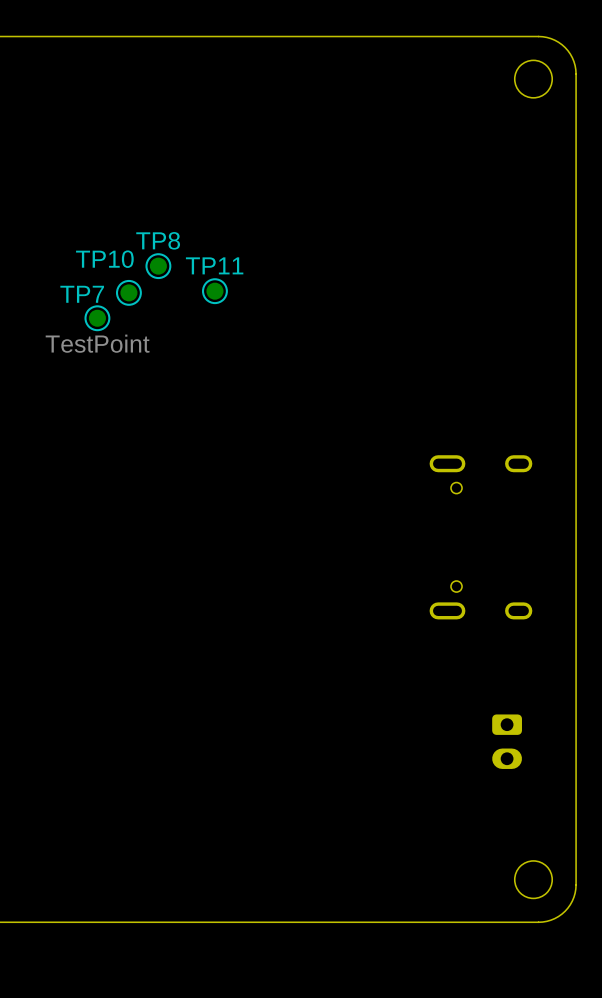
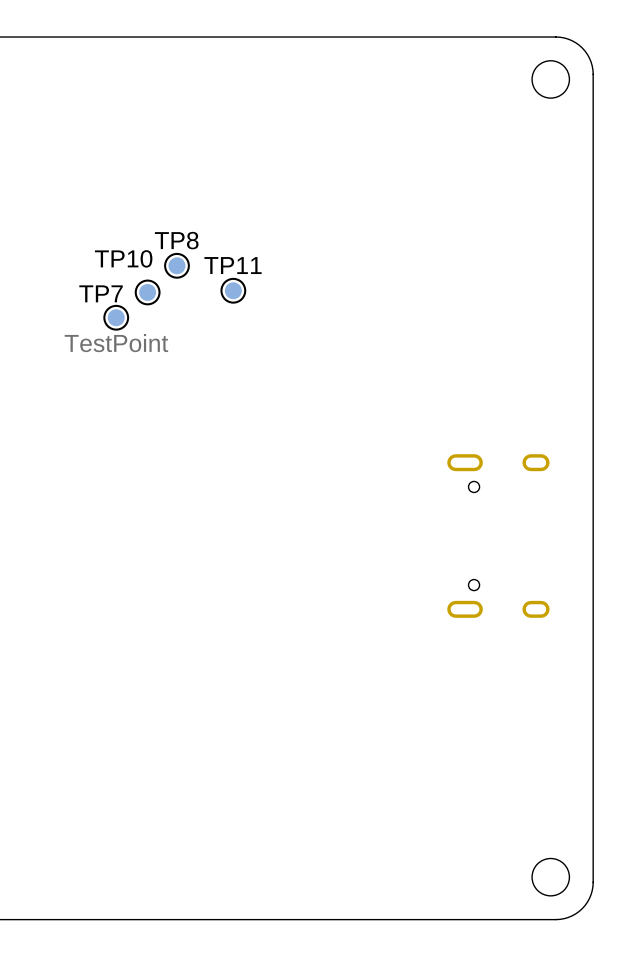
part: (507, 741) -> none

